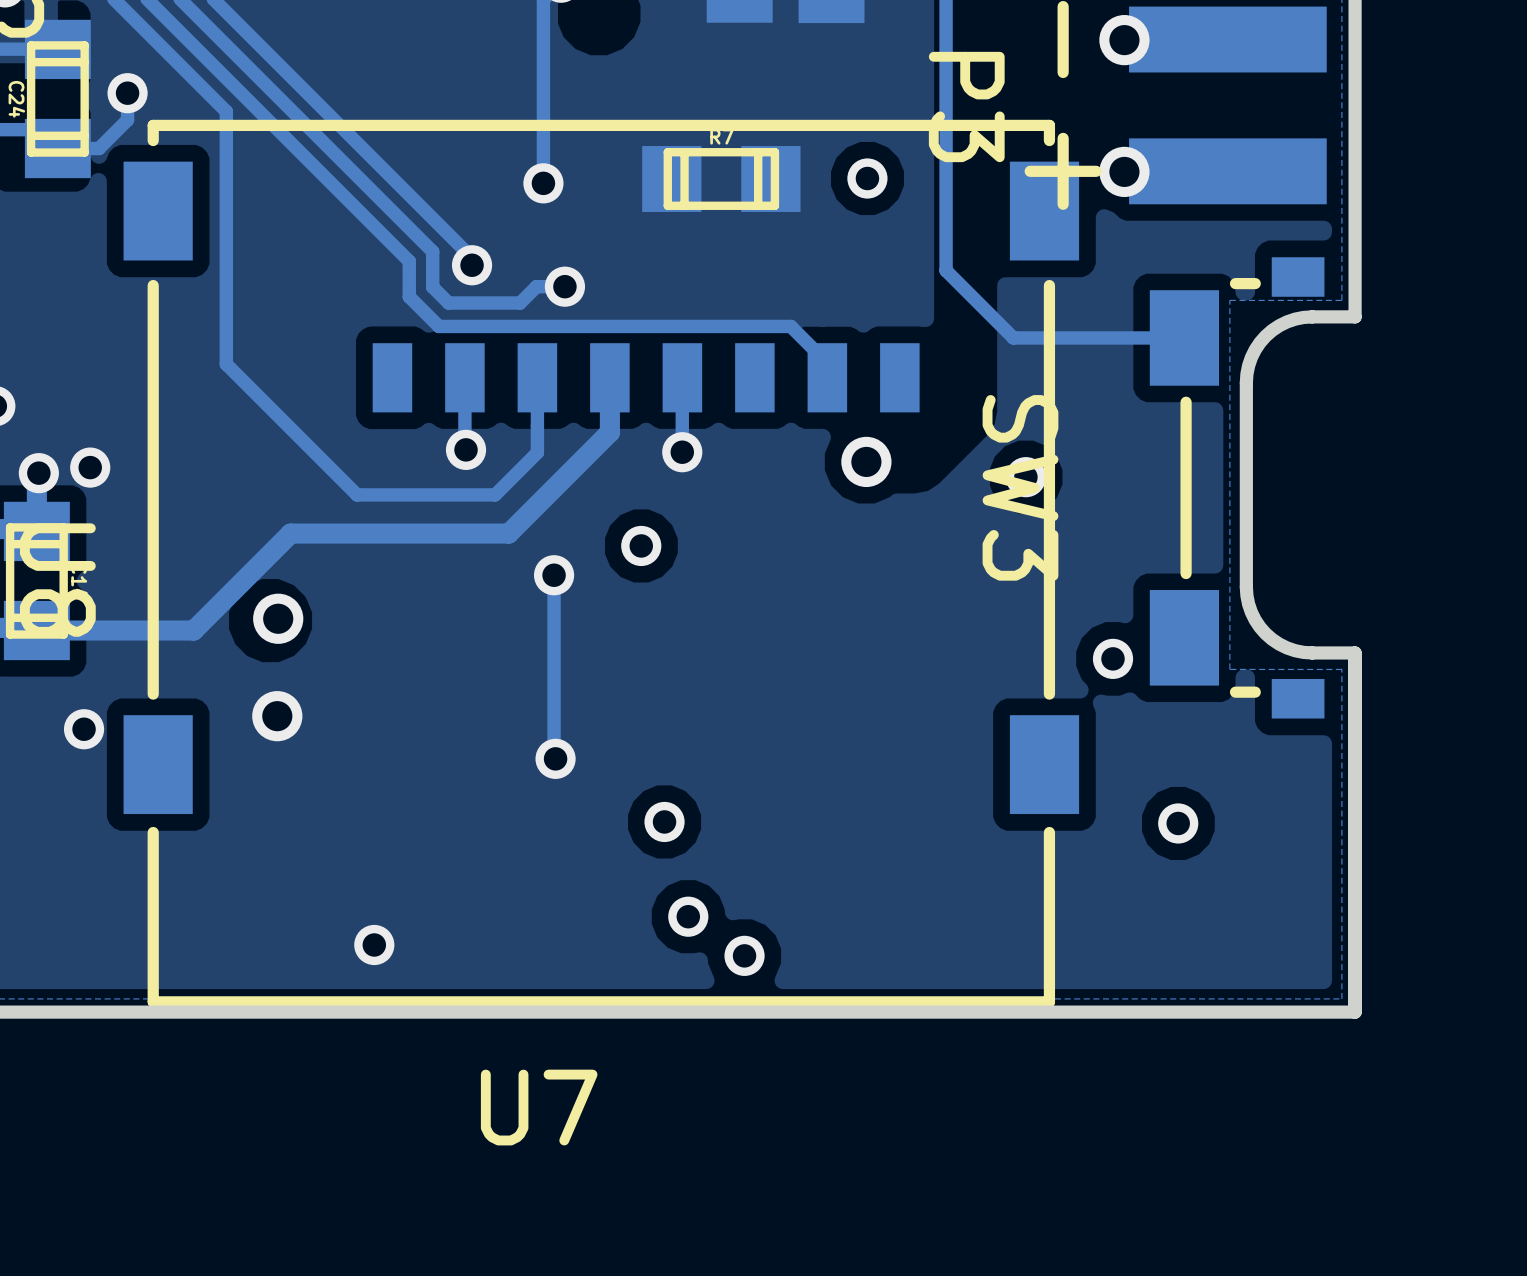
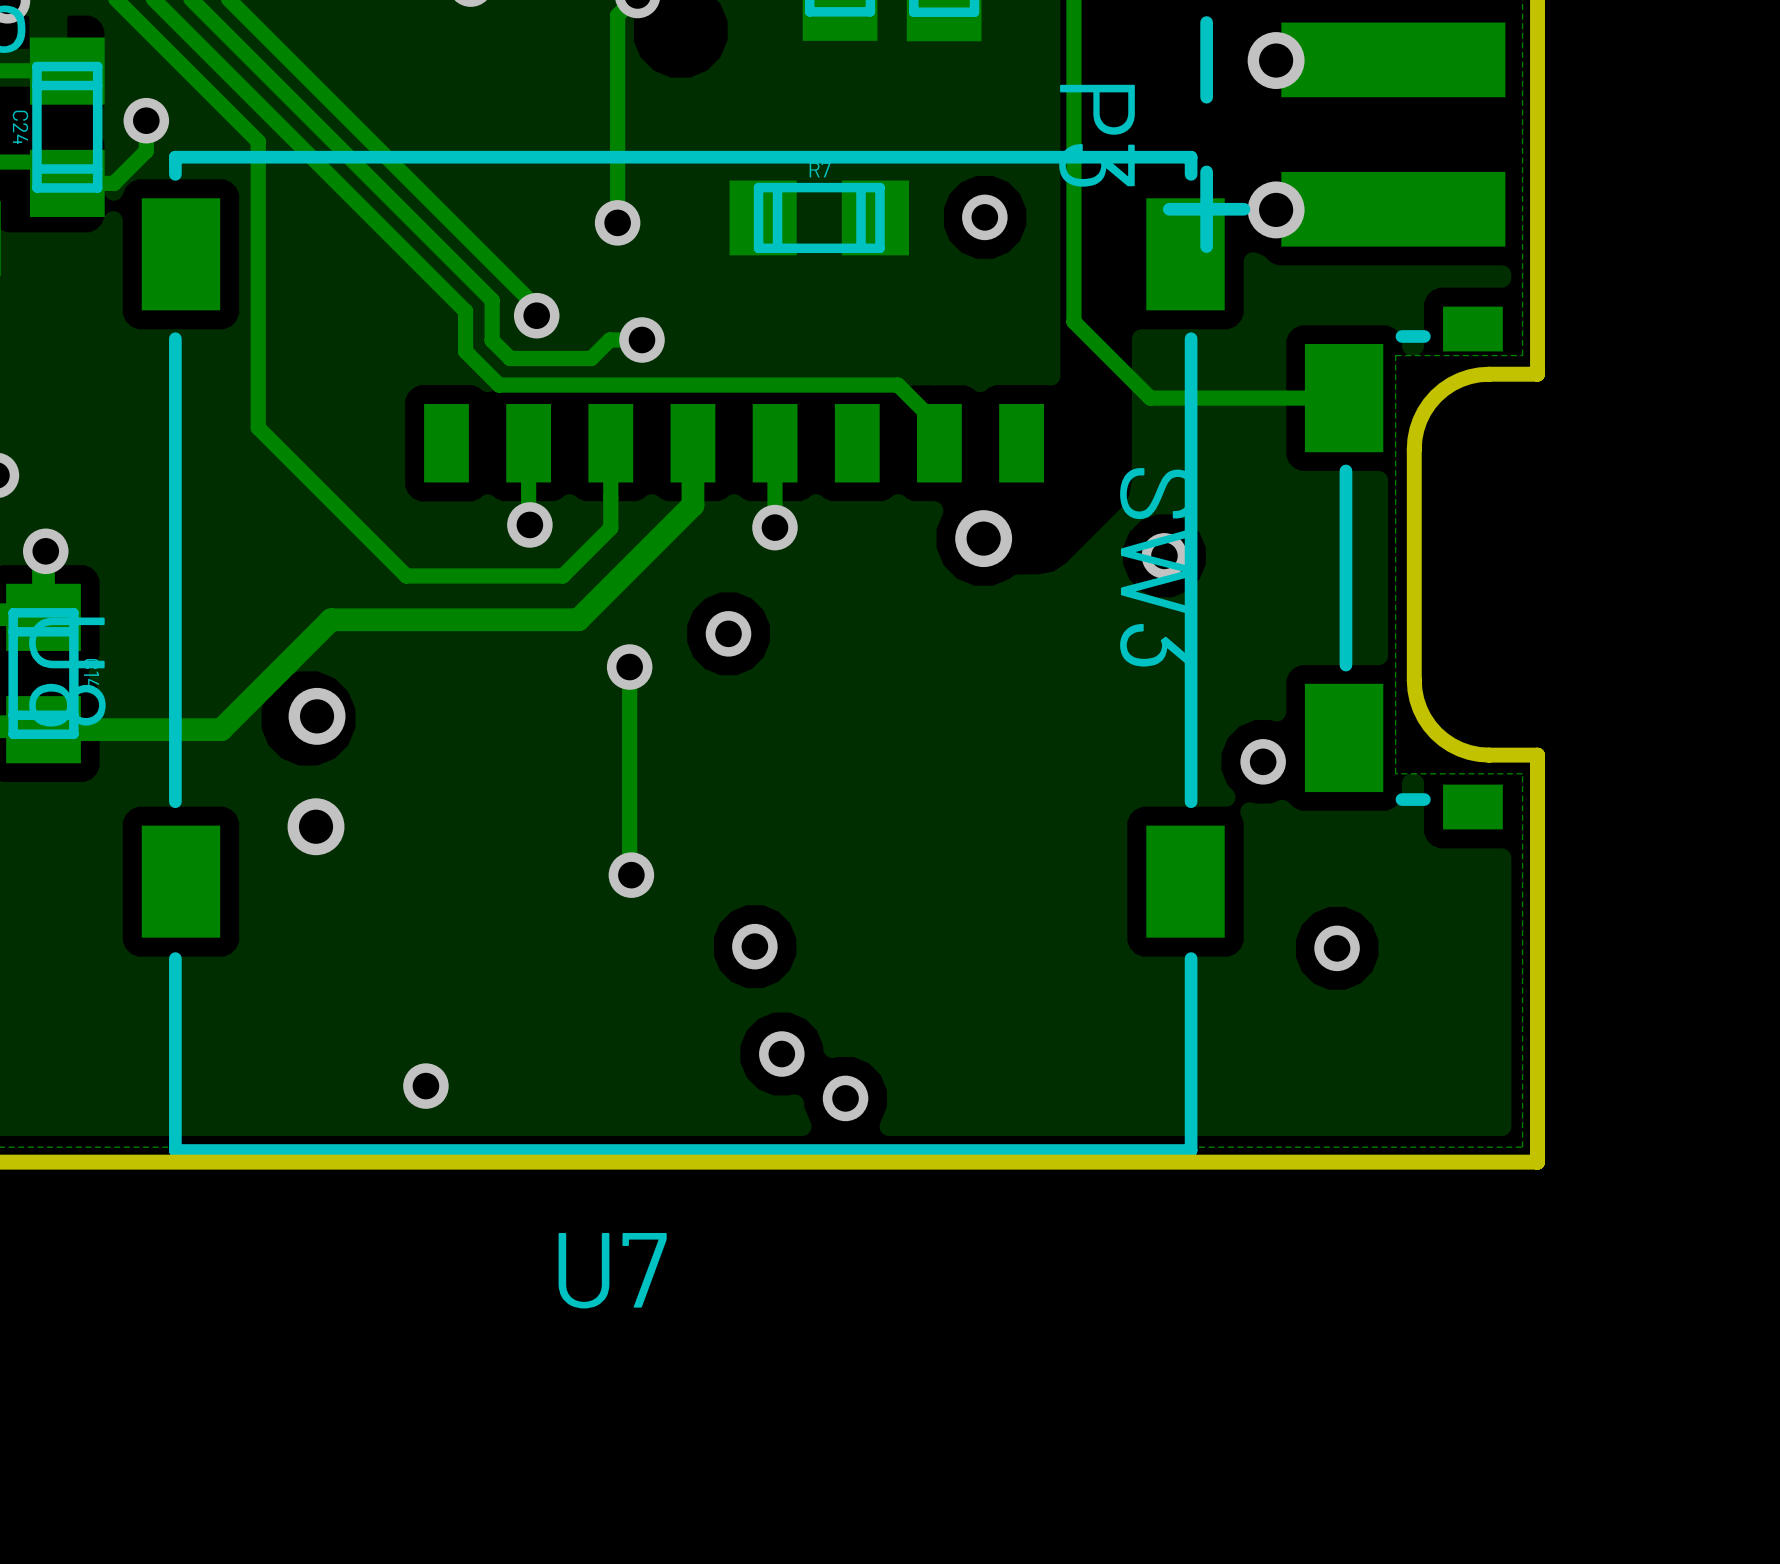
via: (90, 467) -> none
via: (84, 729) -> none

